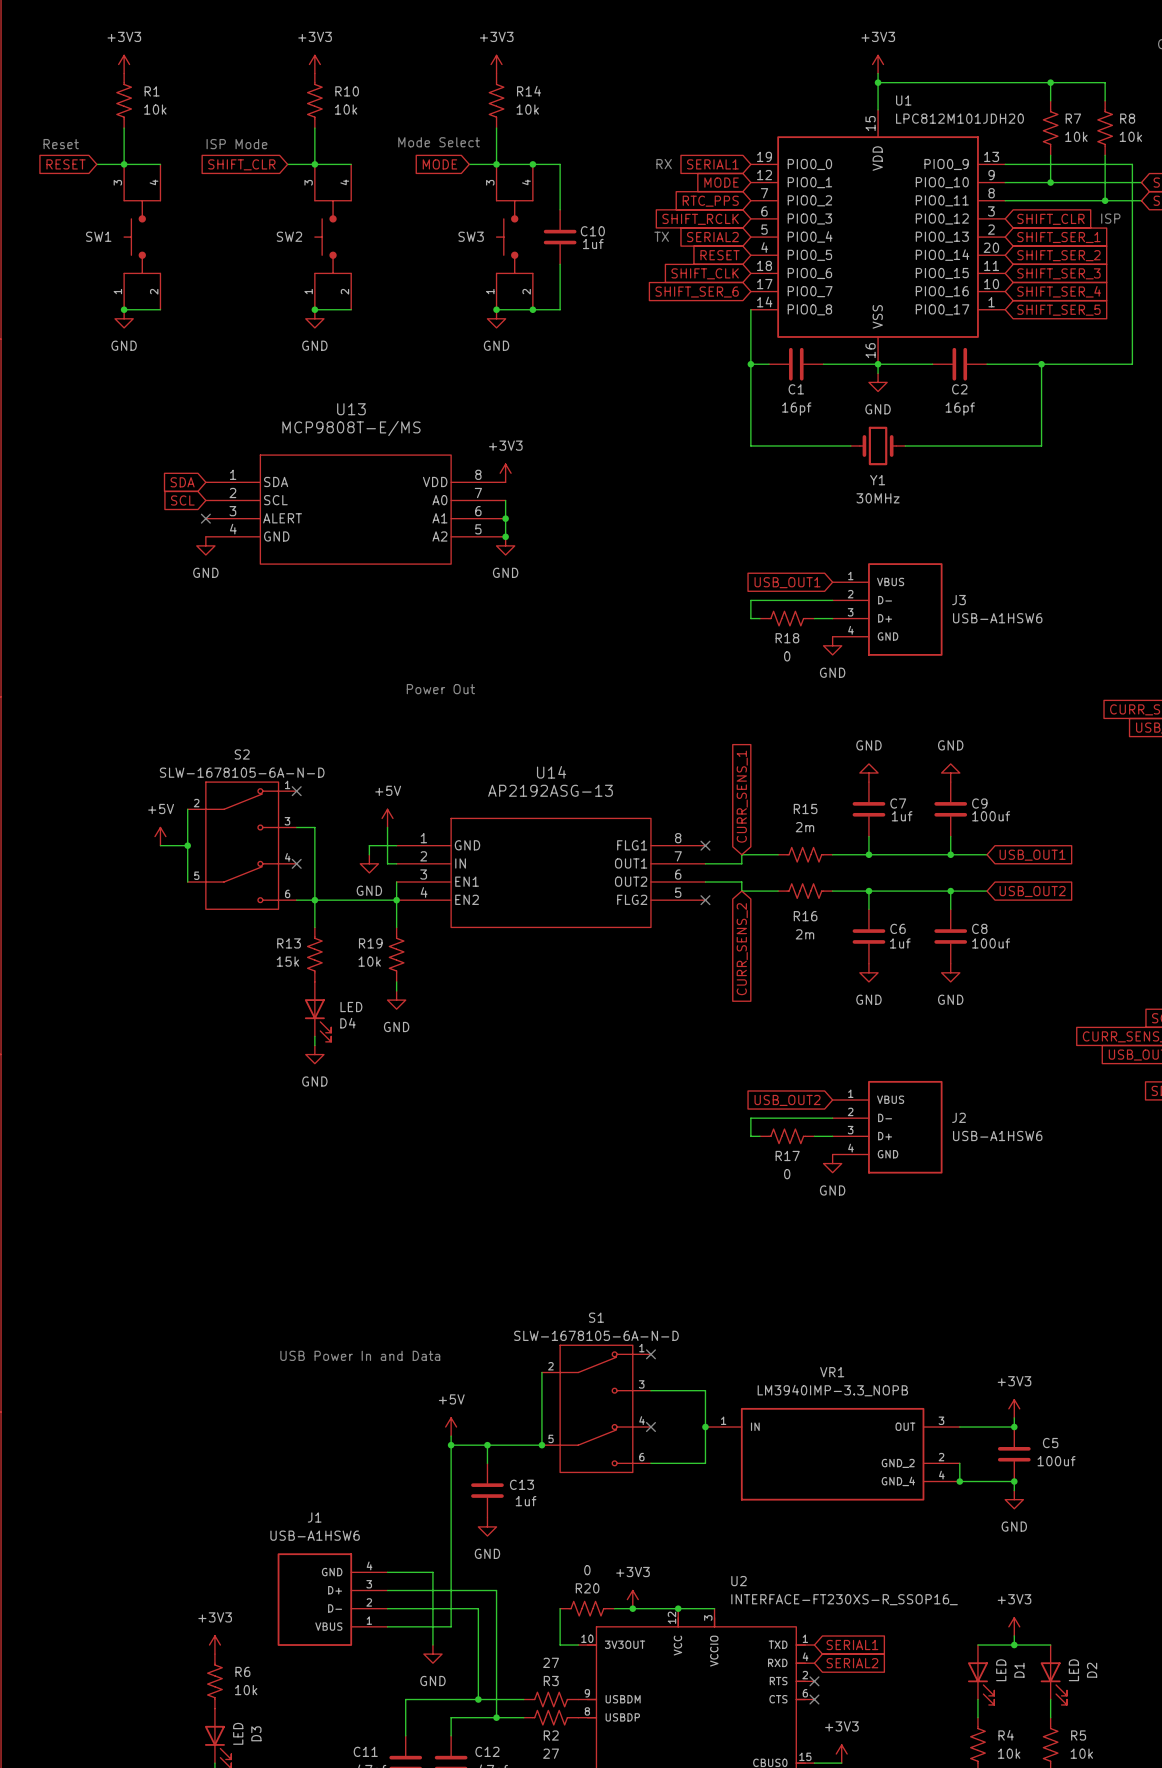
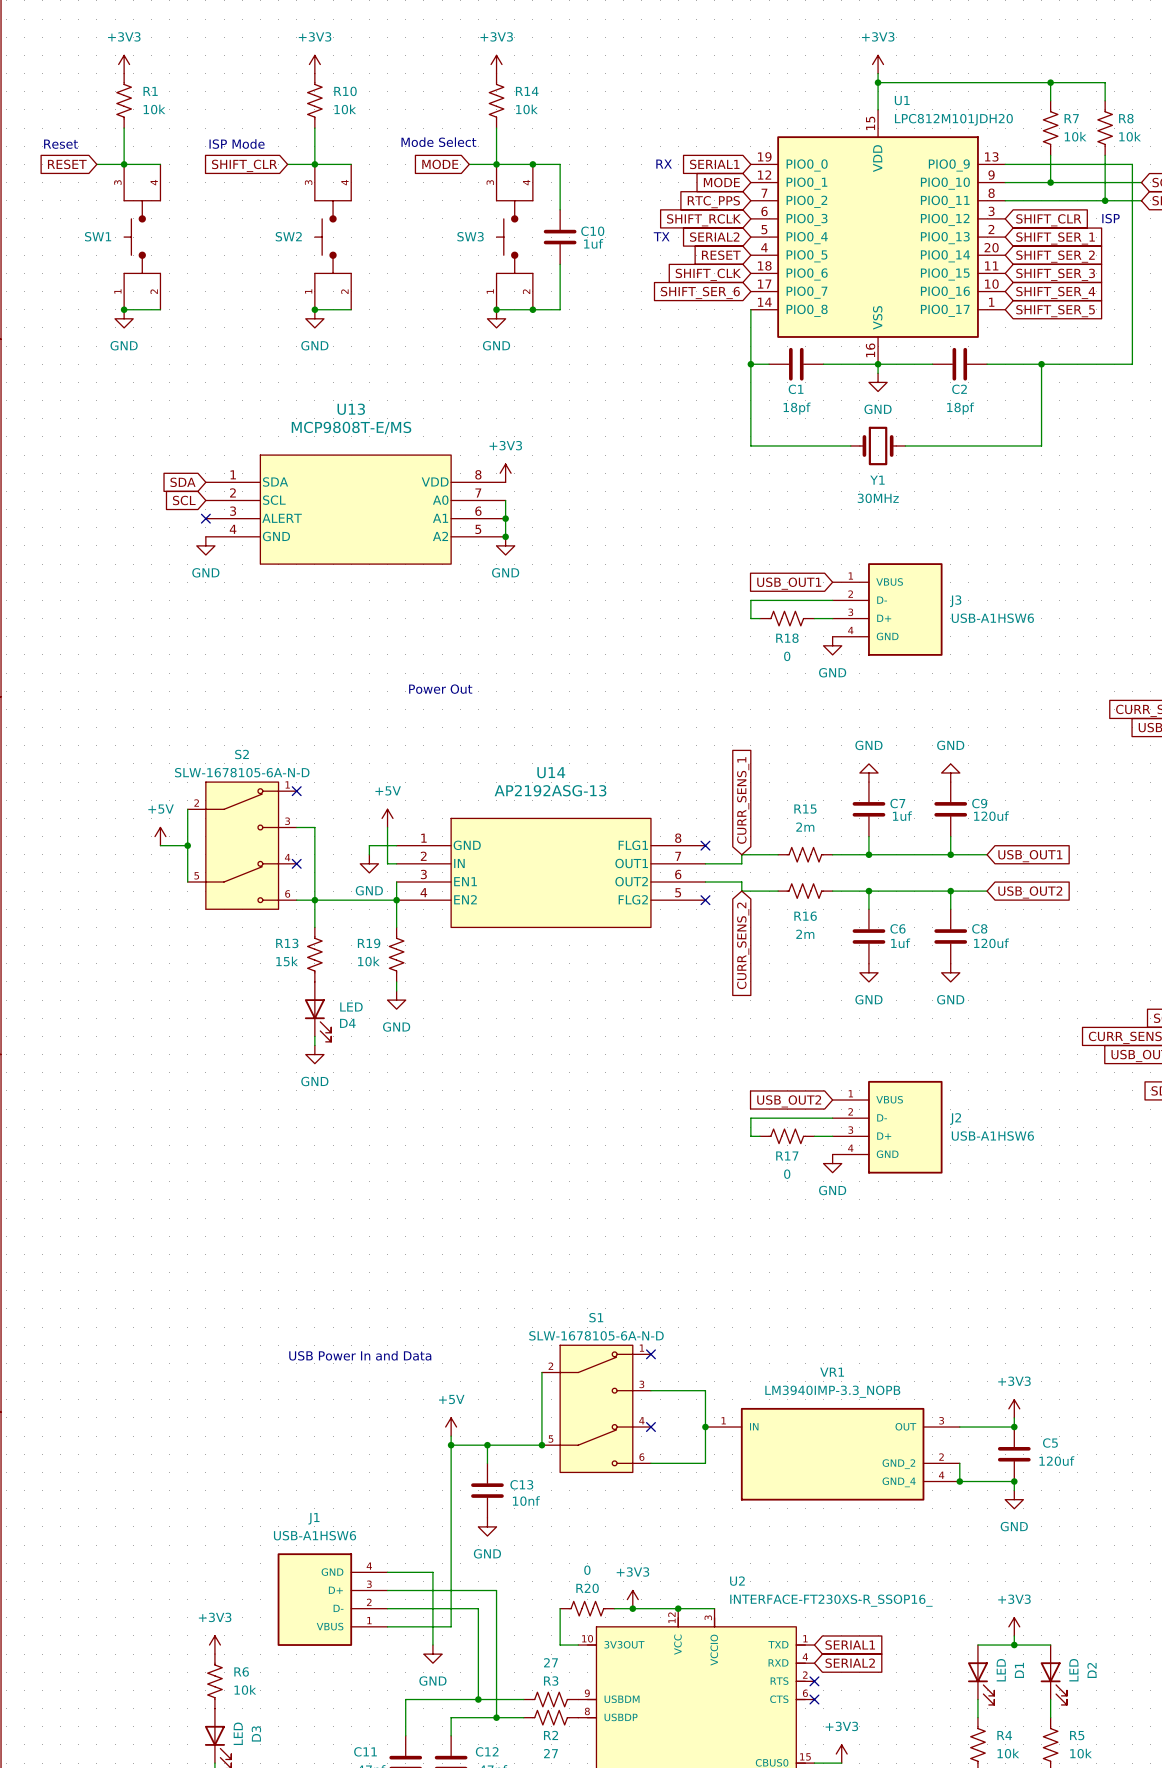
C1 value: 16pf (796, 409) -> 18pf (797, 408)
C2 value: 16pf (960, 409) -> 18pf (960, 408)
C9 value: 100uf (991, 816) -> 120uf (991, 816)
C8 value: 100uf (991, 943) -> 120uf (991, 943)
C5 value: 100uf (1056, 1461) -> 120uf (1056, 1461)
C13 value: 1uf (526, 1501) -> 10nf (526, 1501)

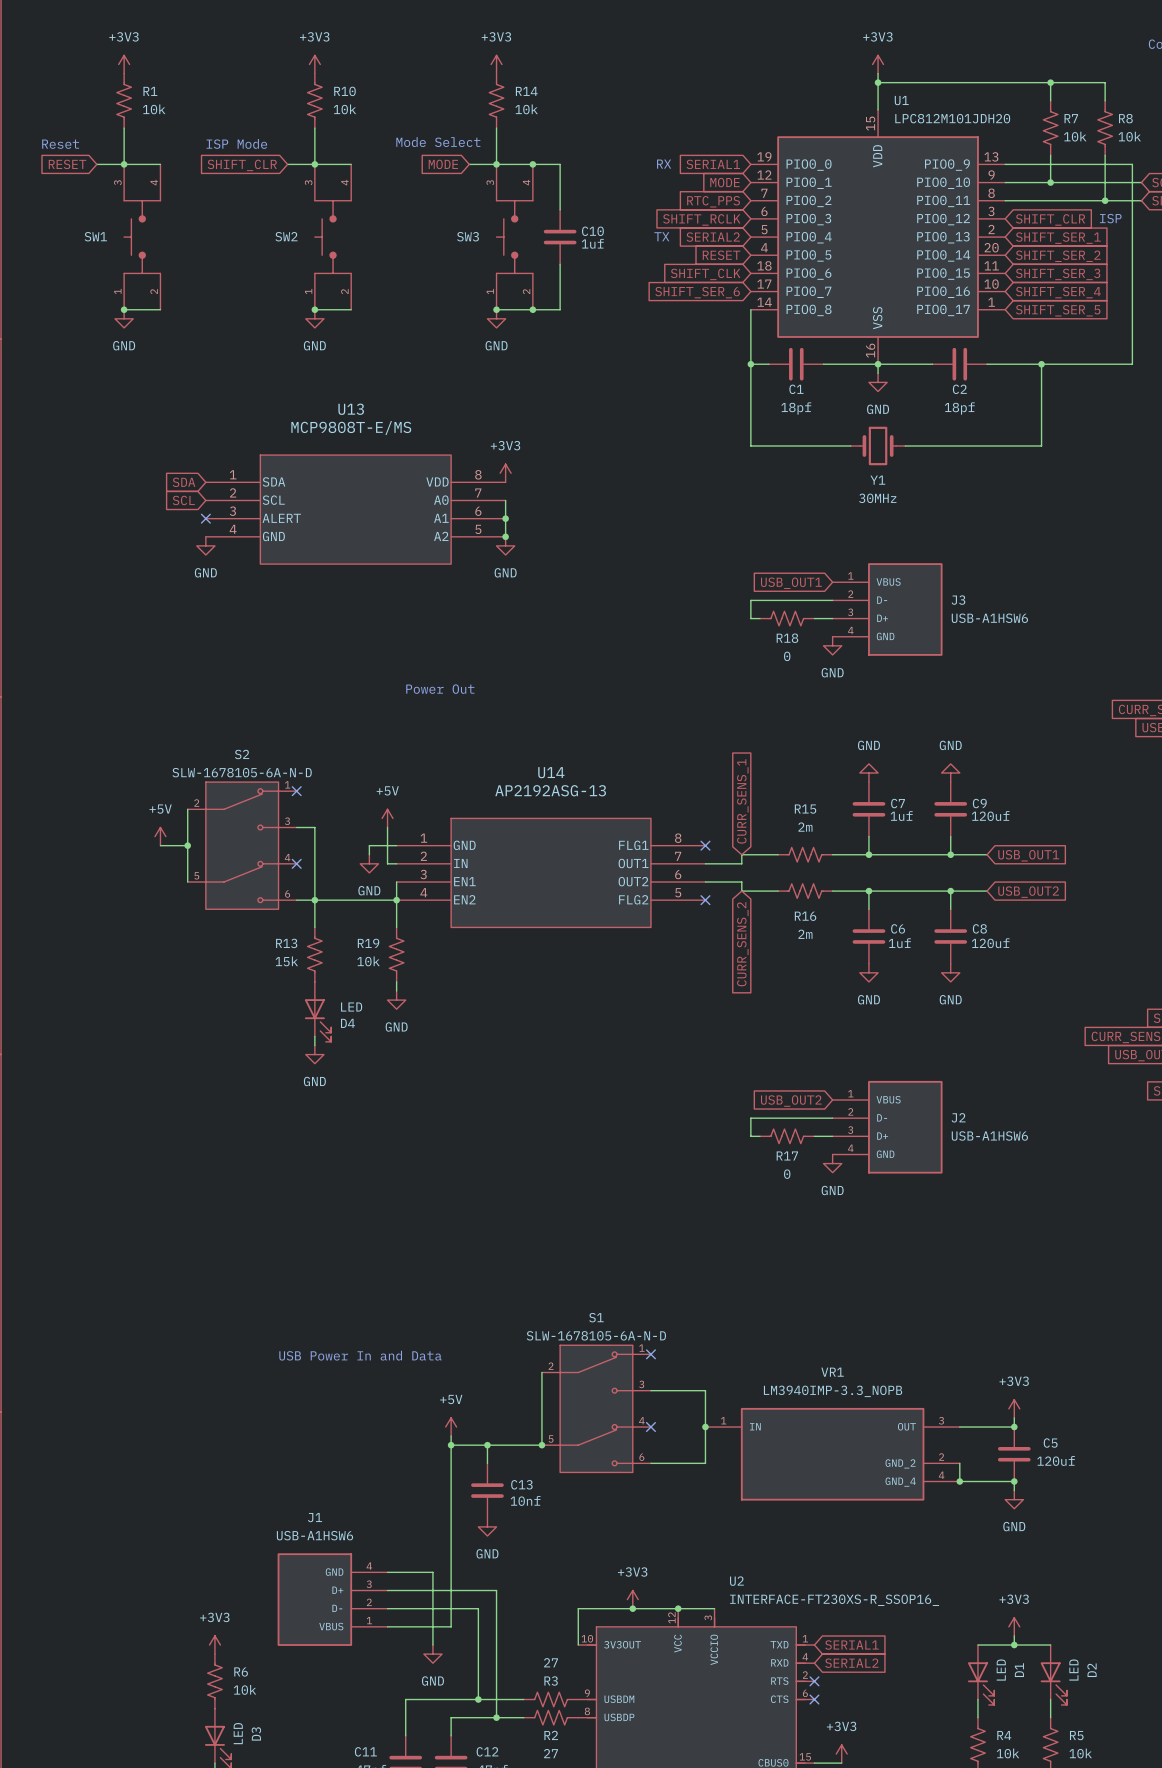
wire: (560, 1608) (560, 1645) (578, 1645) -> (614, 1608) (578, 1608) (578, 1645)
R20: 0 (587, 1608) -> none

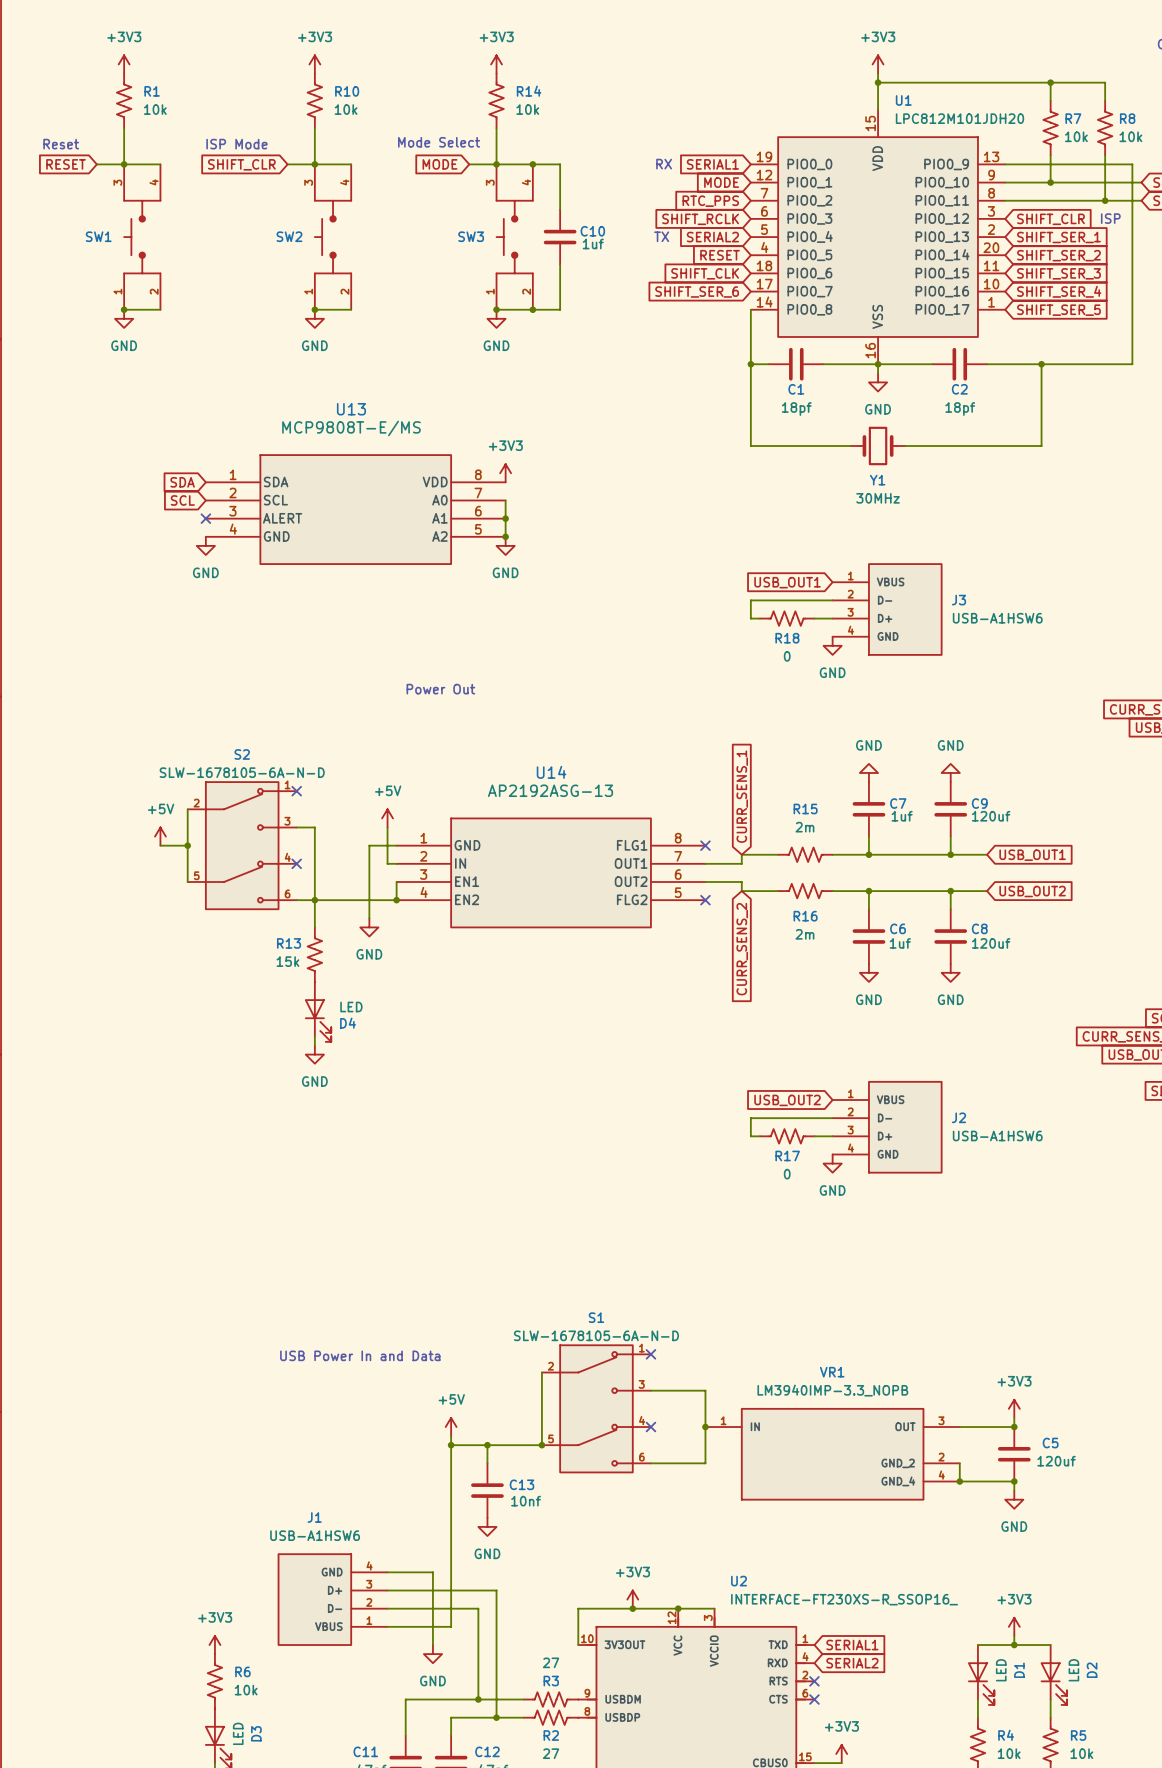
wire: none -> (369, 854) (369, 918)
power symbol: GND (369, 863) -> none
wire: (396, 900) (396, 927) -> none
power symbol: none -> GND (369, 927)
R19: 10k (396, 954) -> none
wire: (396, 981) (396, 991) -> none
power symbol: GND (396, 1000) -> none

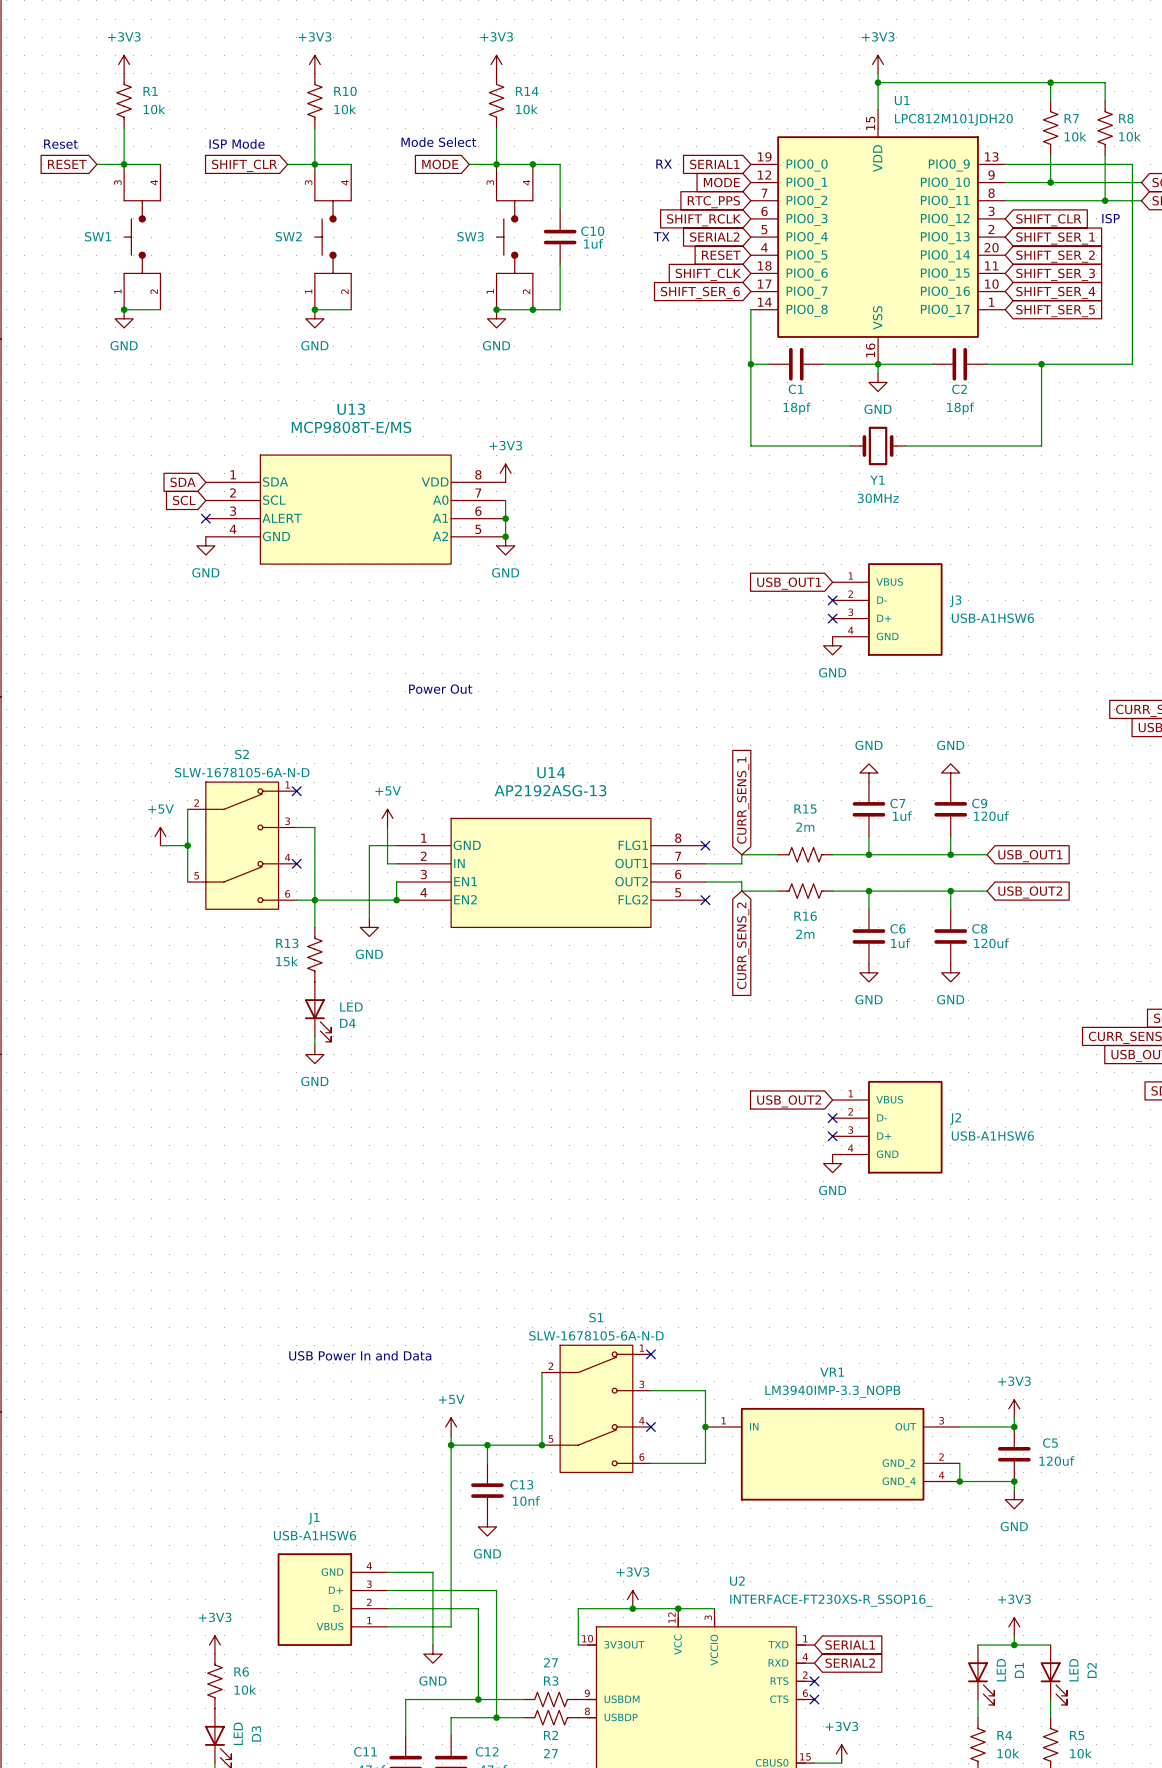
wire: (832, 600) (750, 600) (750, 618) (759, 618) -> none
no-connect mark: none -> (832, 600)
R18: 0 (787, 618) -> none
wire: (814, 618) (832, 618) -> none
no-connect mark: none -> (832, 618)
wire: (832, 1118) (750, 1118) (750, 1136) (759, 1136) -> none
no-connect mark: none -> (832, 1118)
R17: 0 (787, 1136) -> none
wire: (814, 1136) (832, 1136) -> none
no-connect mark: none -> (832, 1136)

